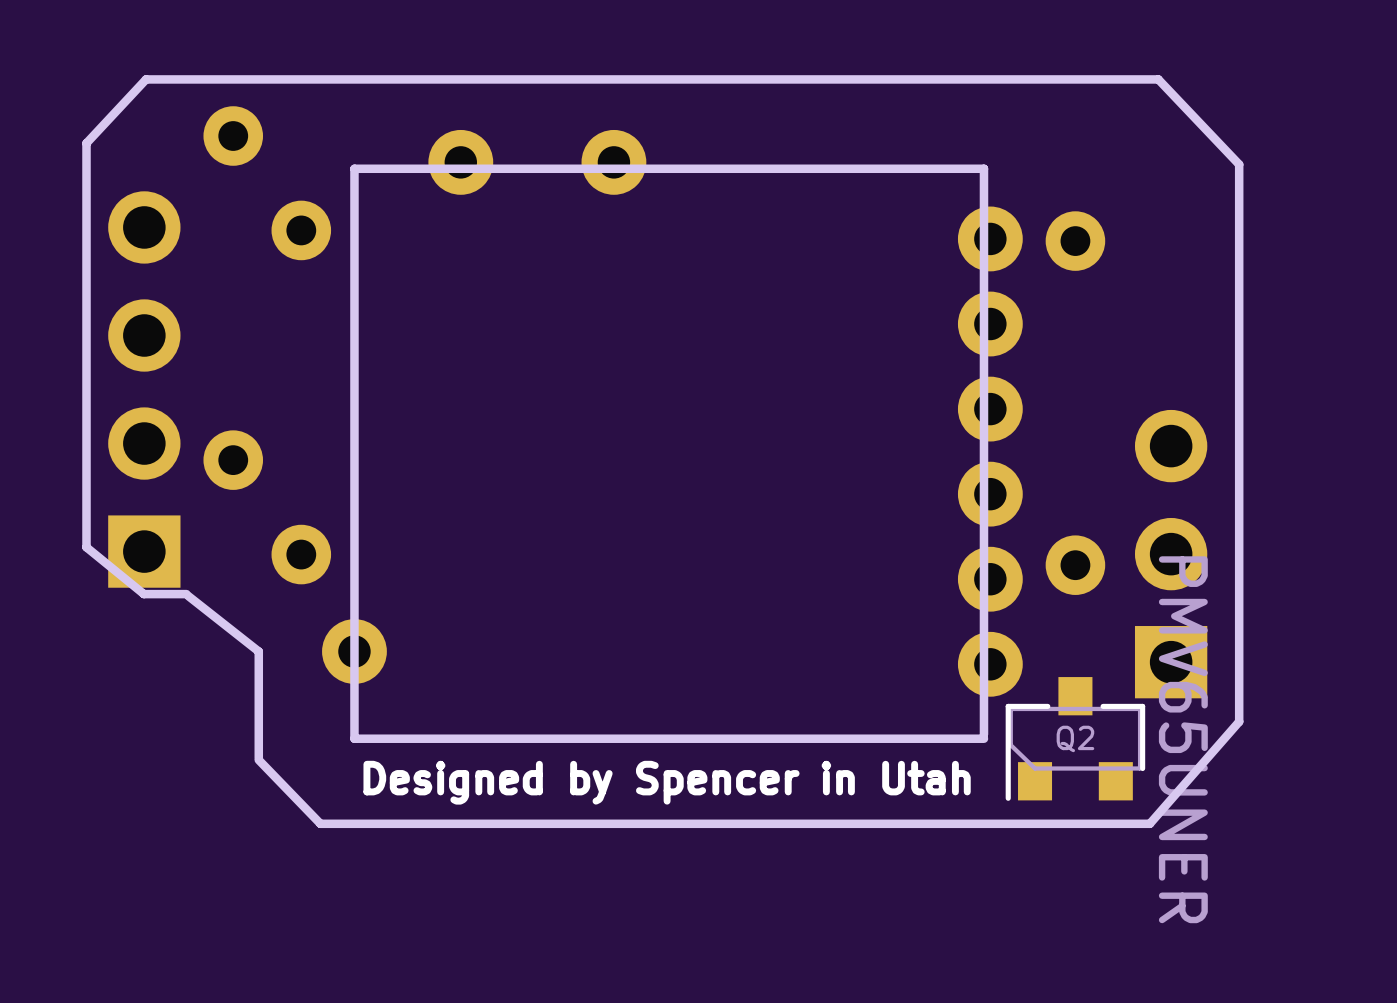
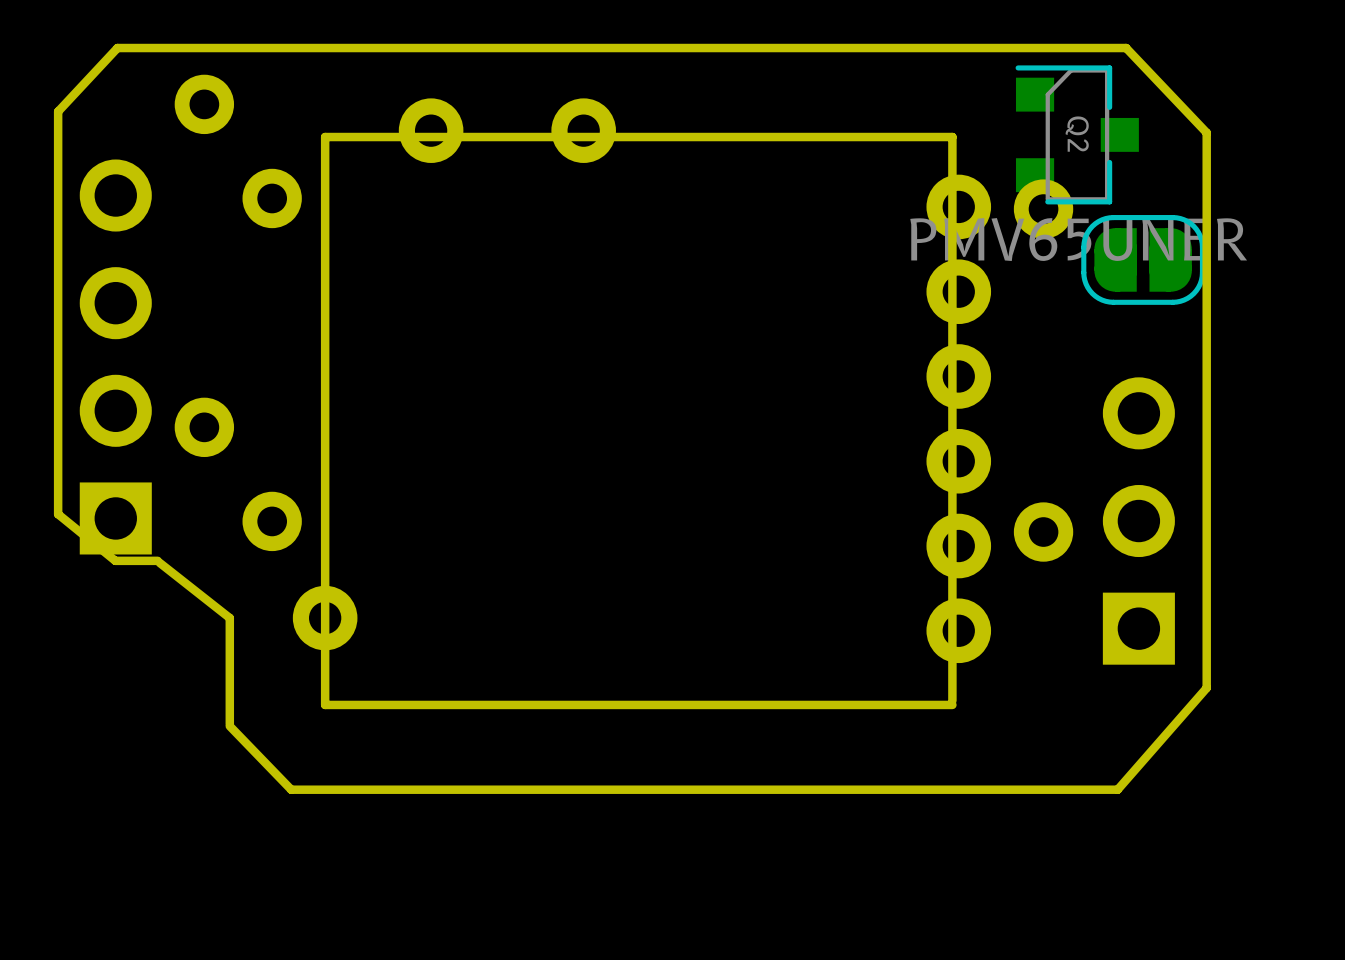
part: none -> (1143, 259)
Q2 rotation: 0° (1075, 738) -> 90° clockwise (1077, 134)
Q2 position: (1075, 738) -> (1077, 134)
text: Designed by Spencer in Utah (667, 782) -> none

